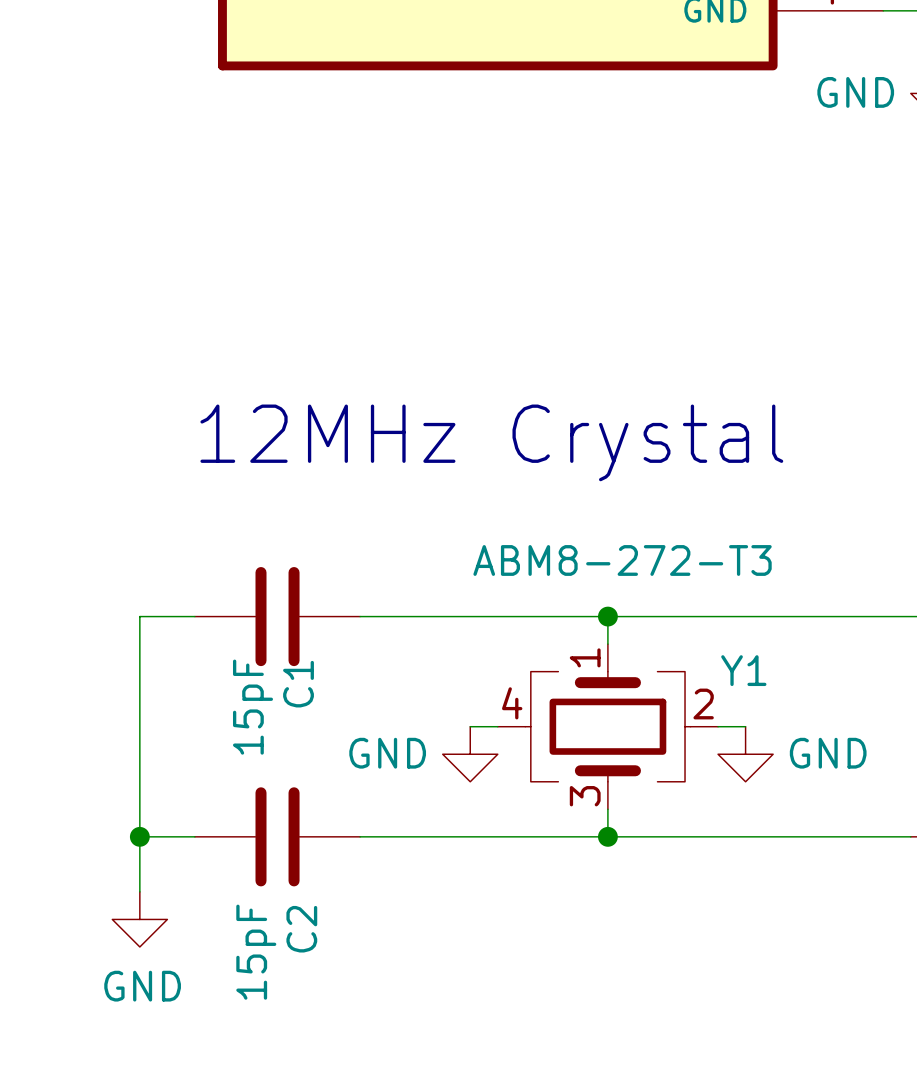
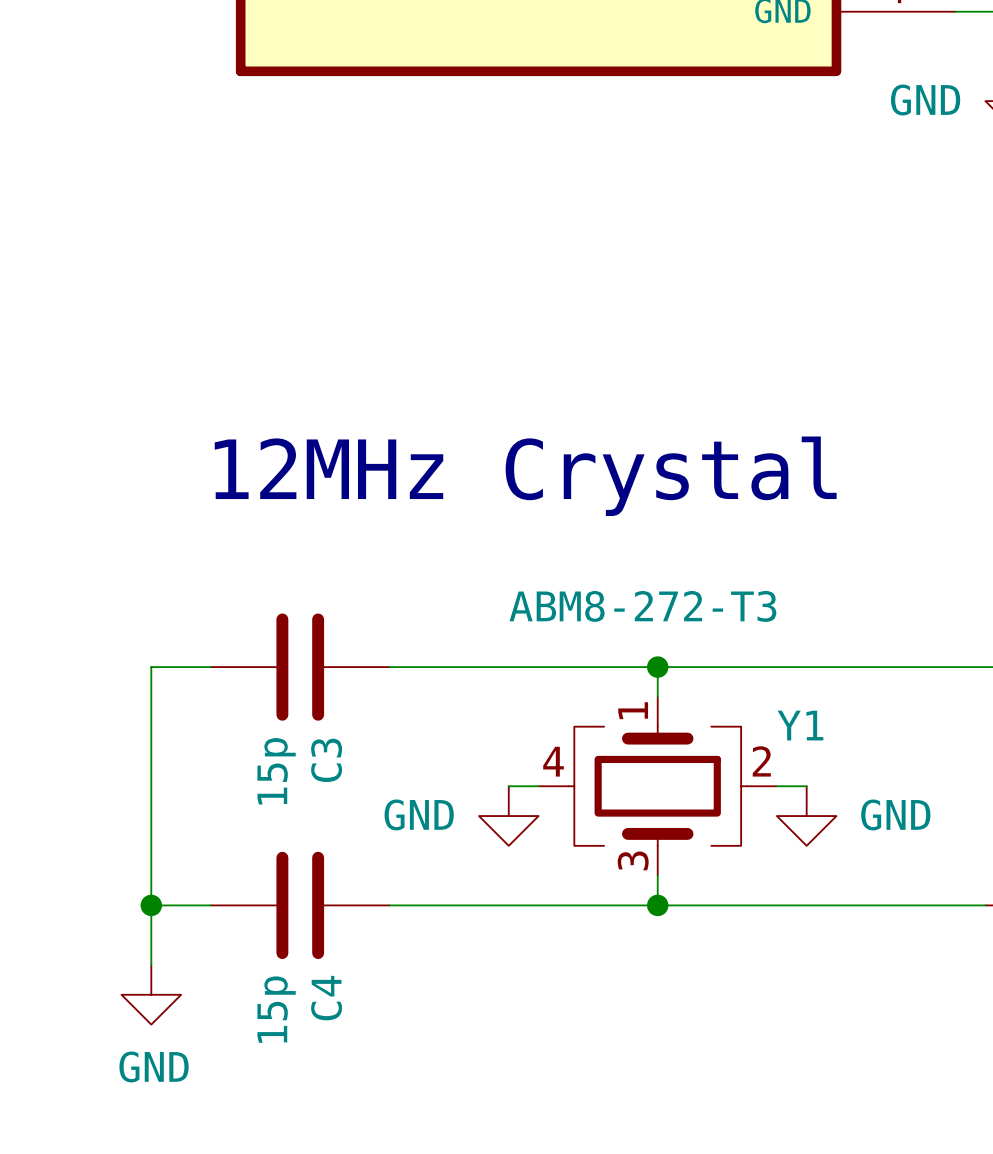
C1 name: C1 (298, 684) -> C3 (326, 760)
C1 value: 15pF (252, 707) -> 15p (276, 771)
C2 name: C2 (301, 929) -> C4 (326, 998)
C2 value: 15pF (256, 952) -> 15p (276, 1009)

